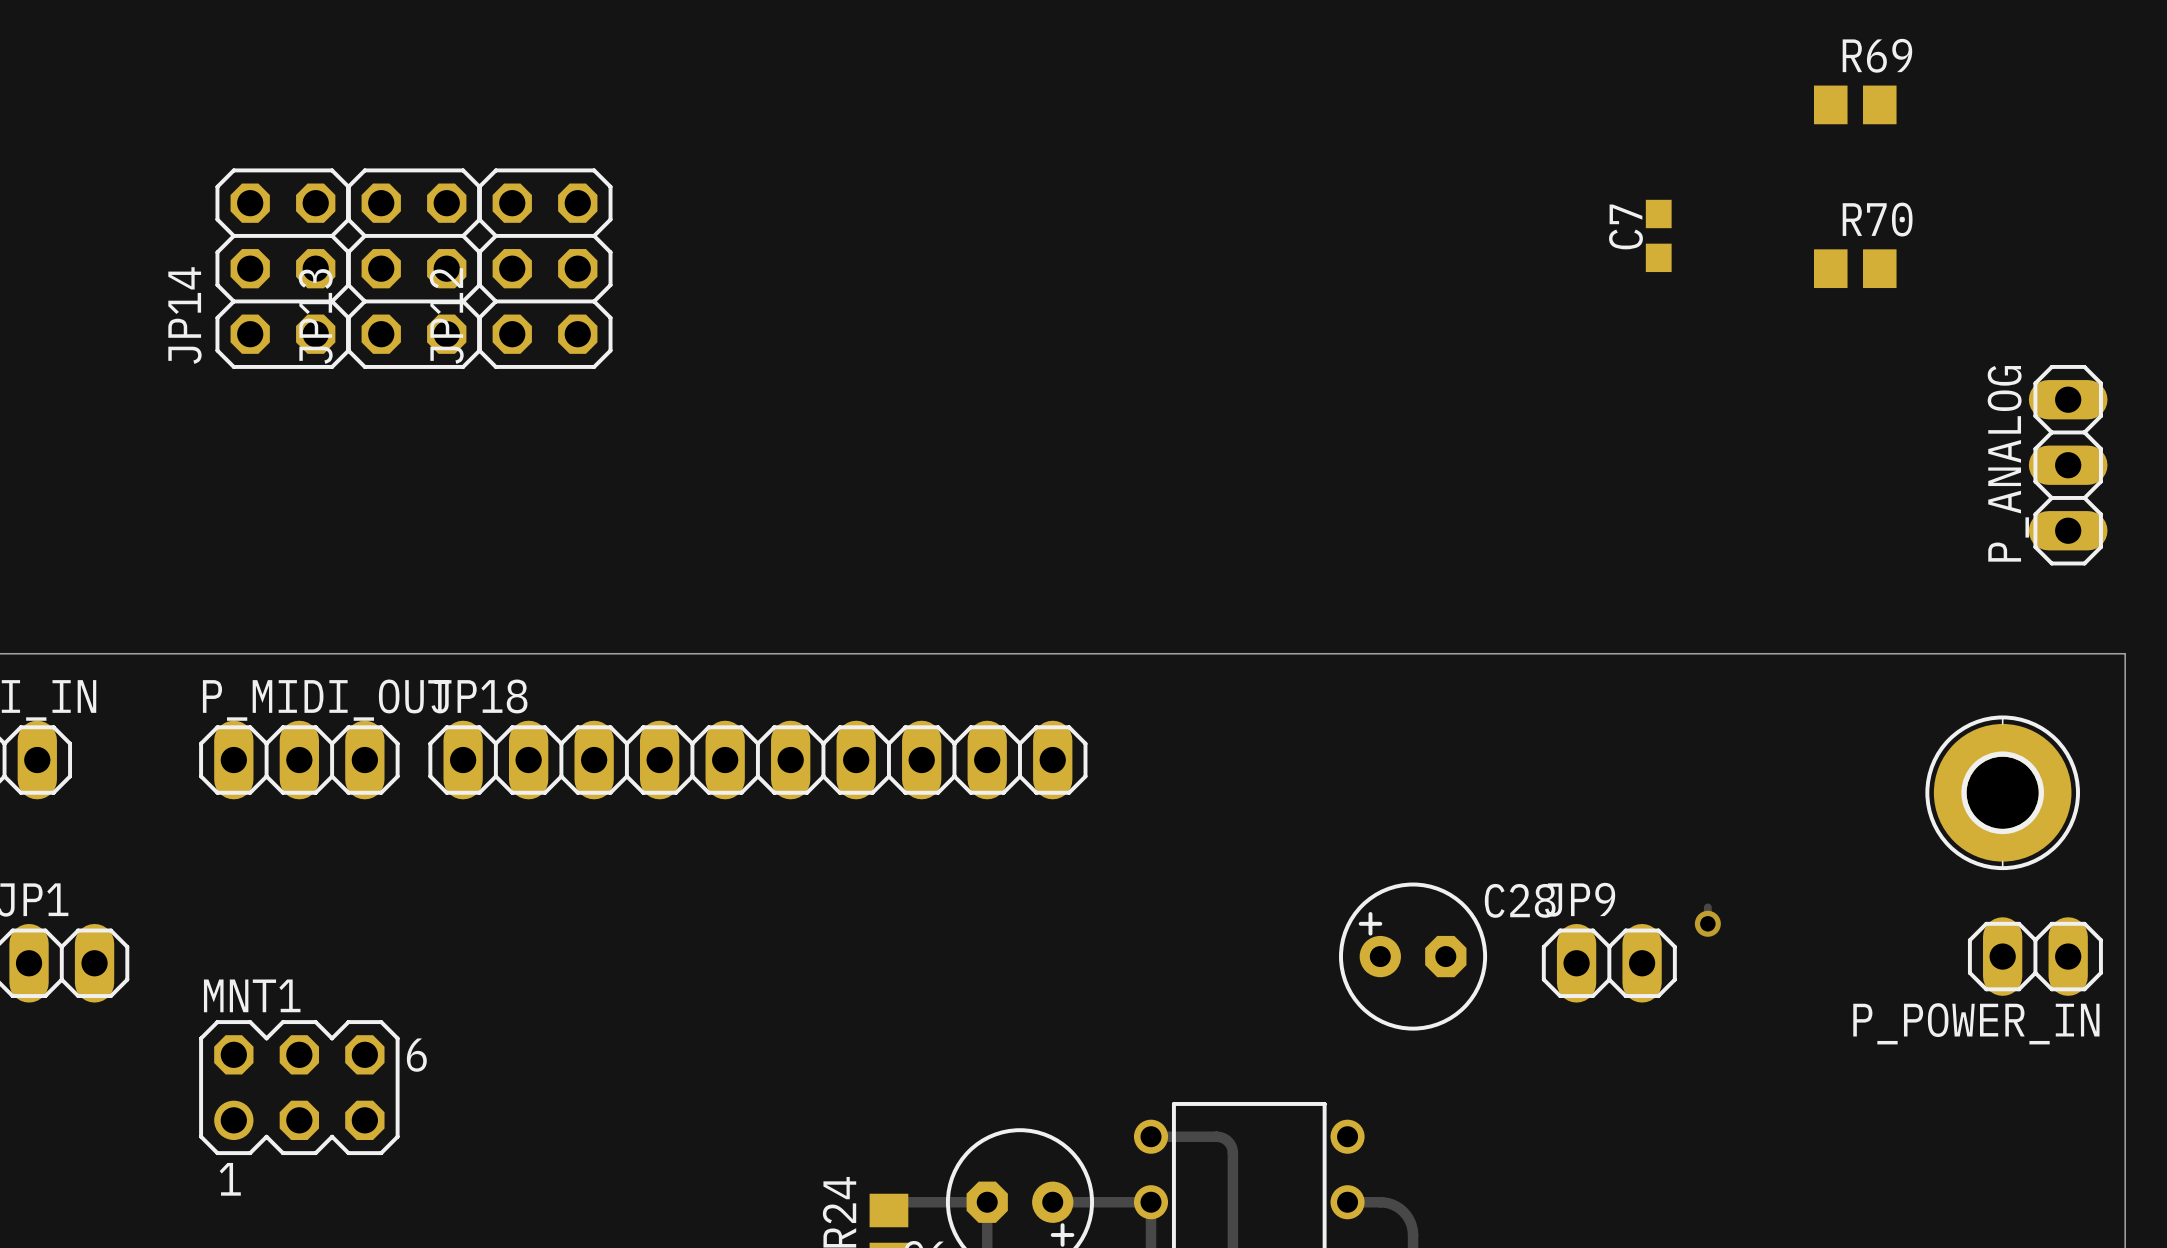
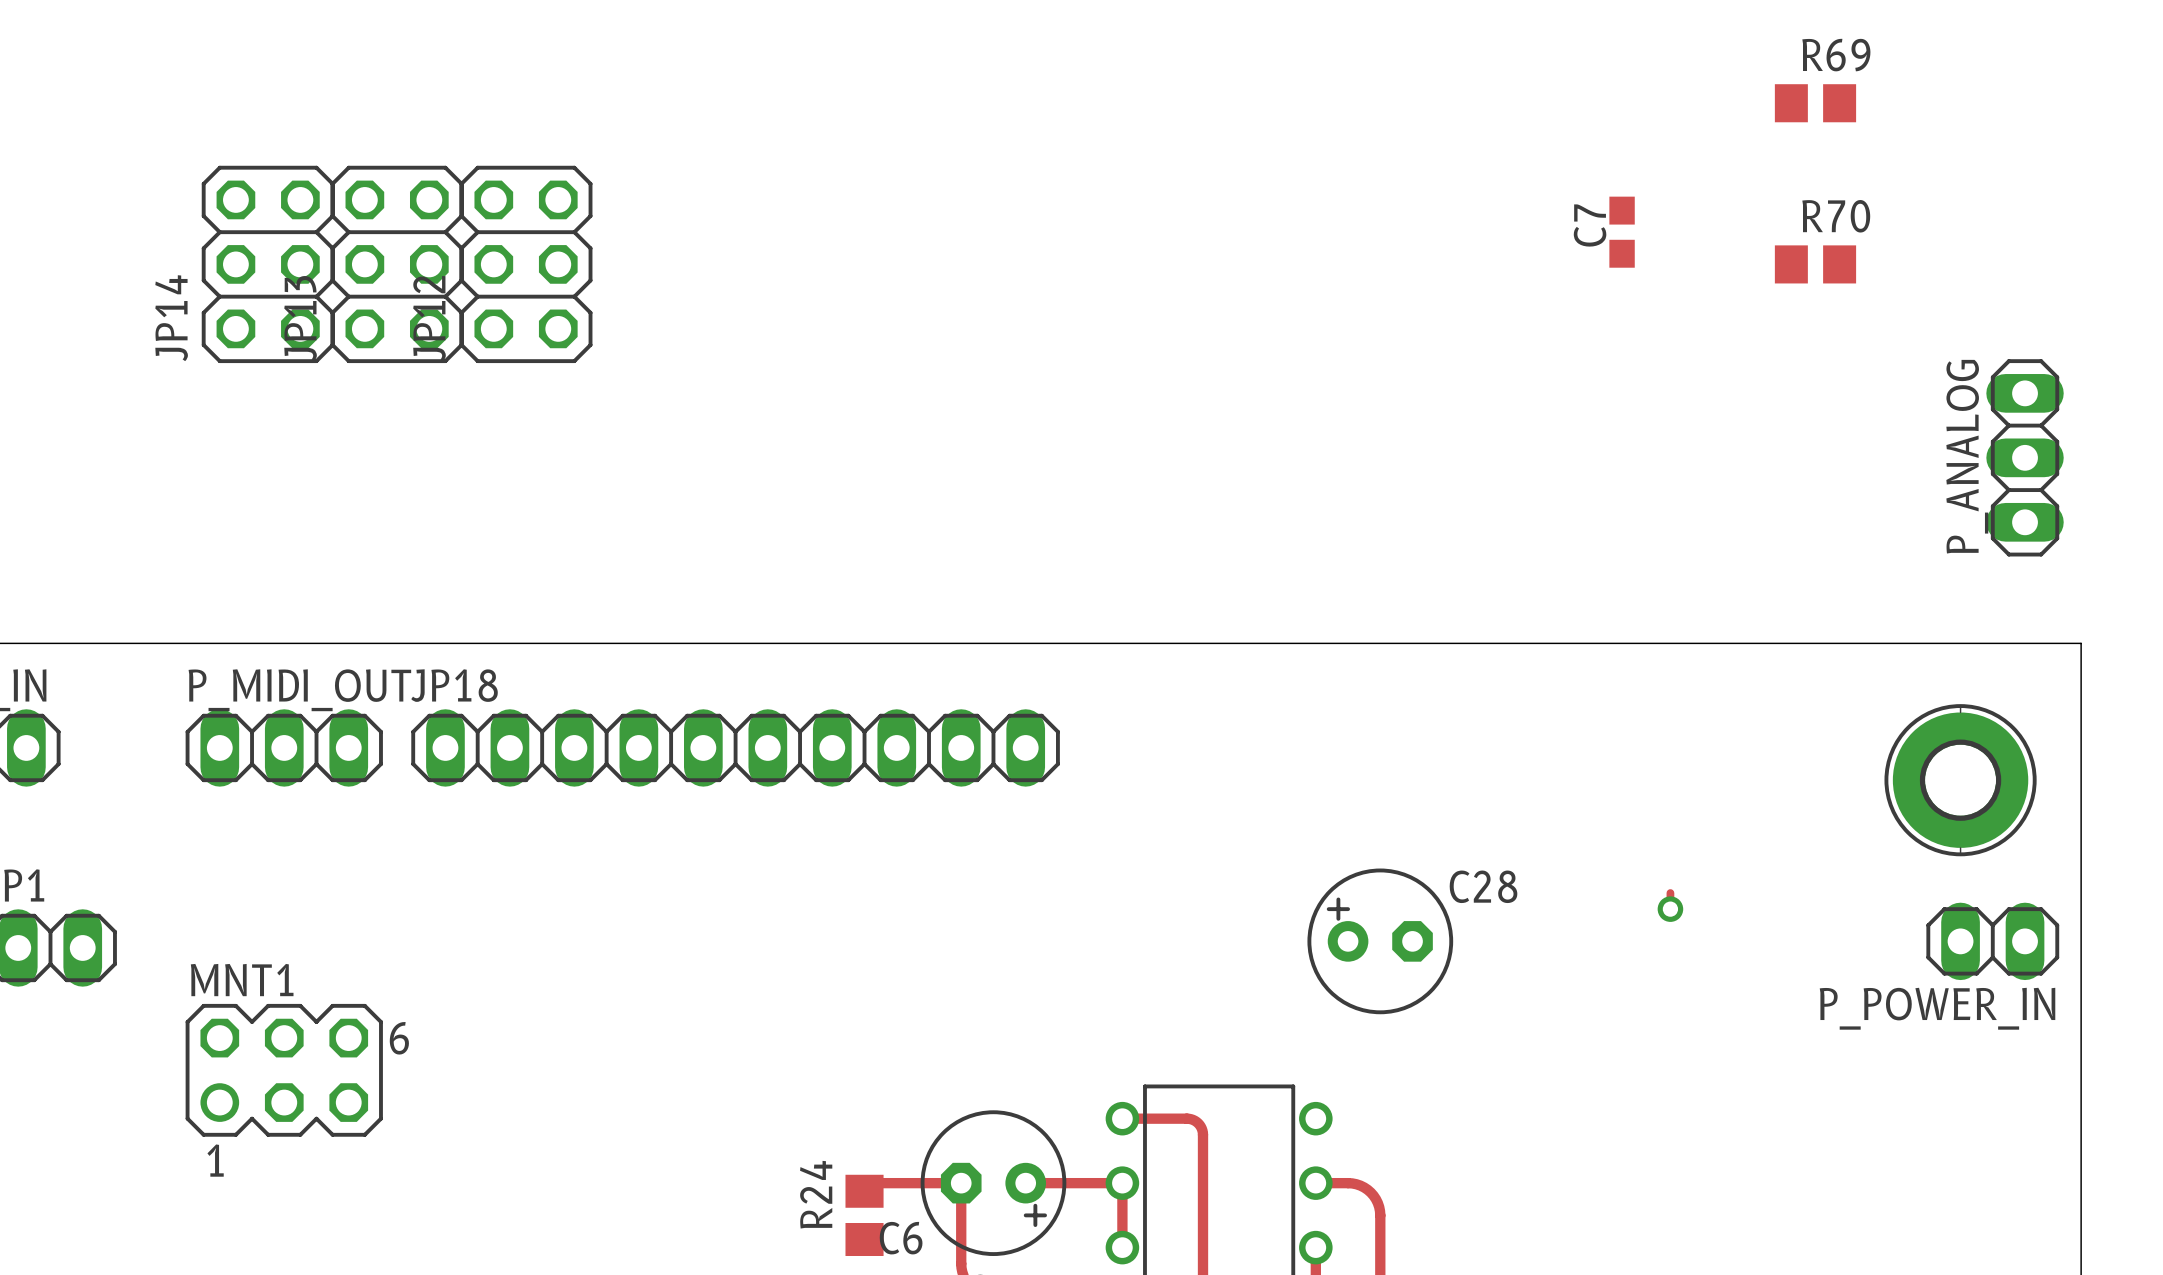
JP9: (1609, 963) -> none

